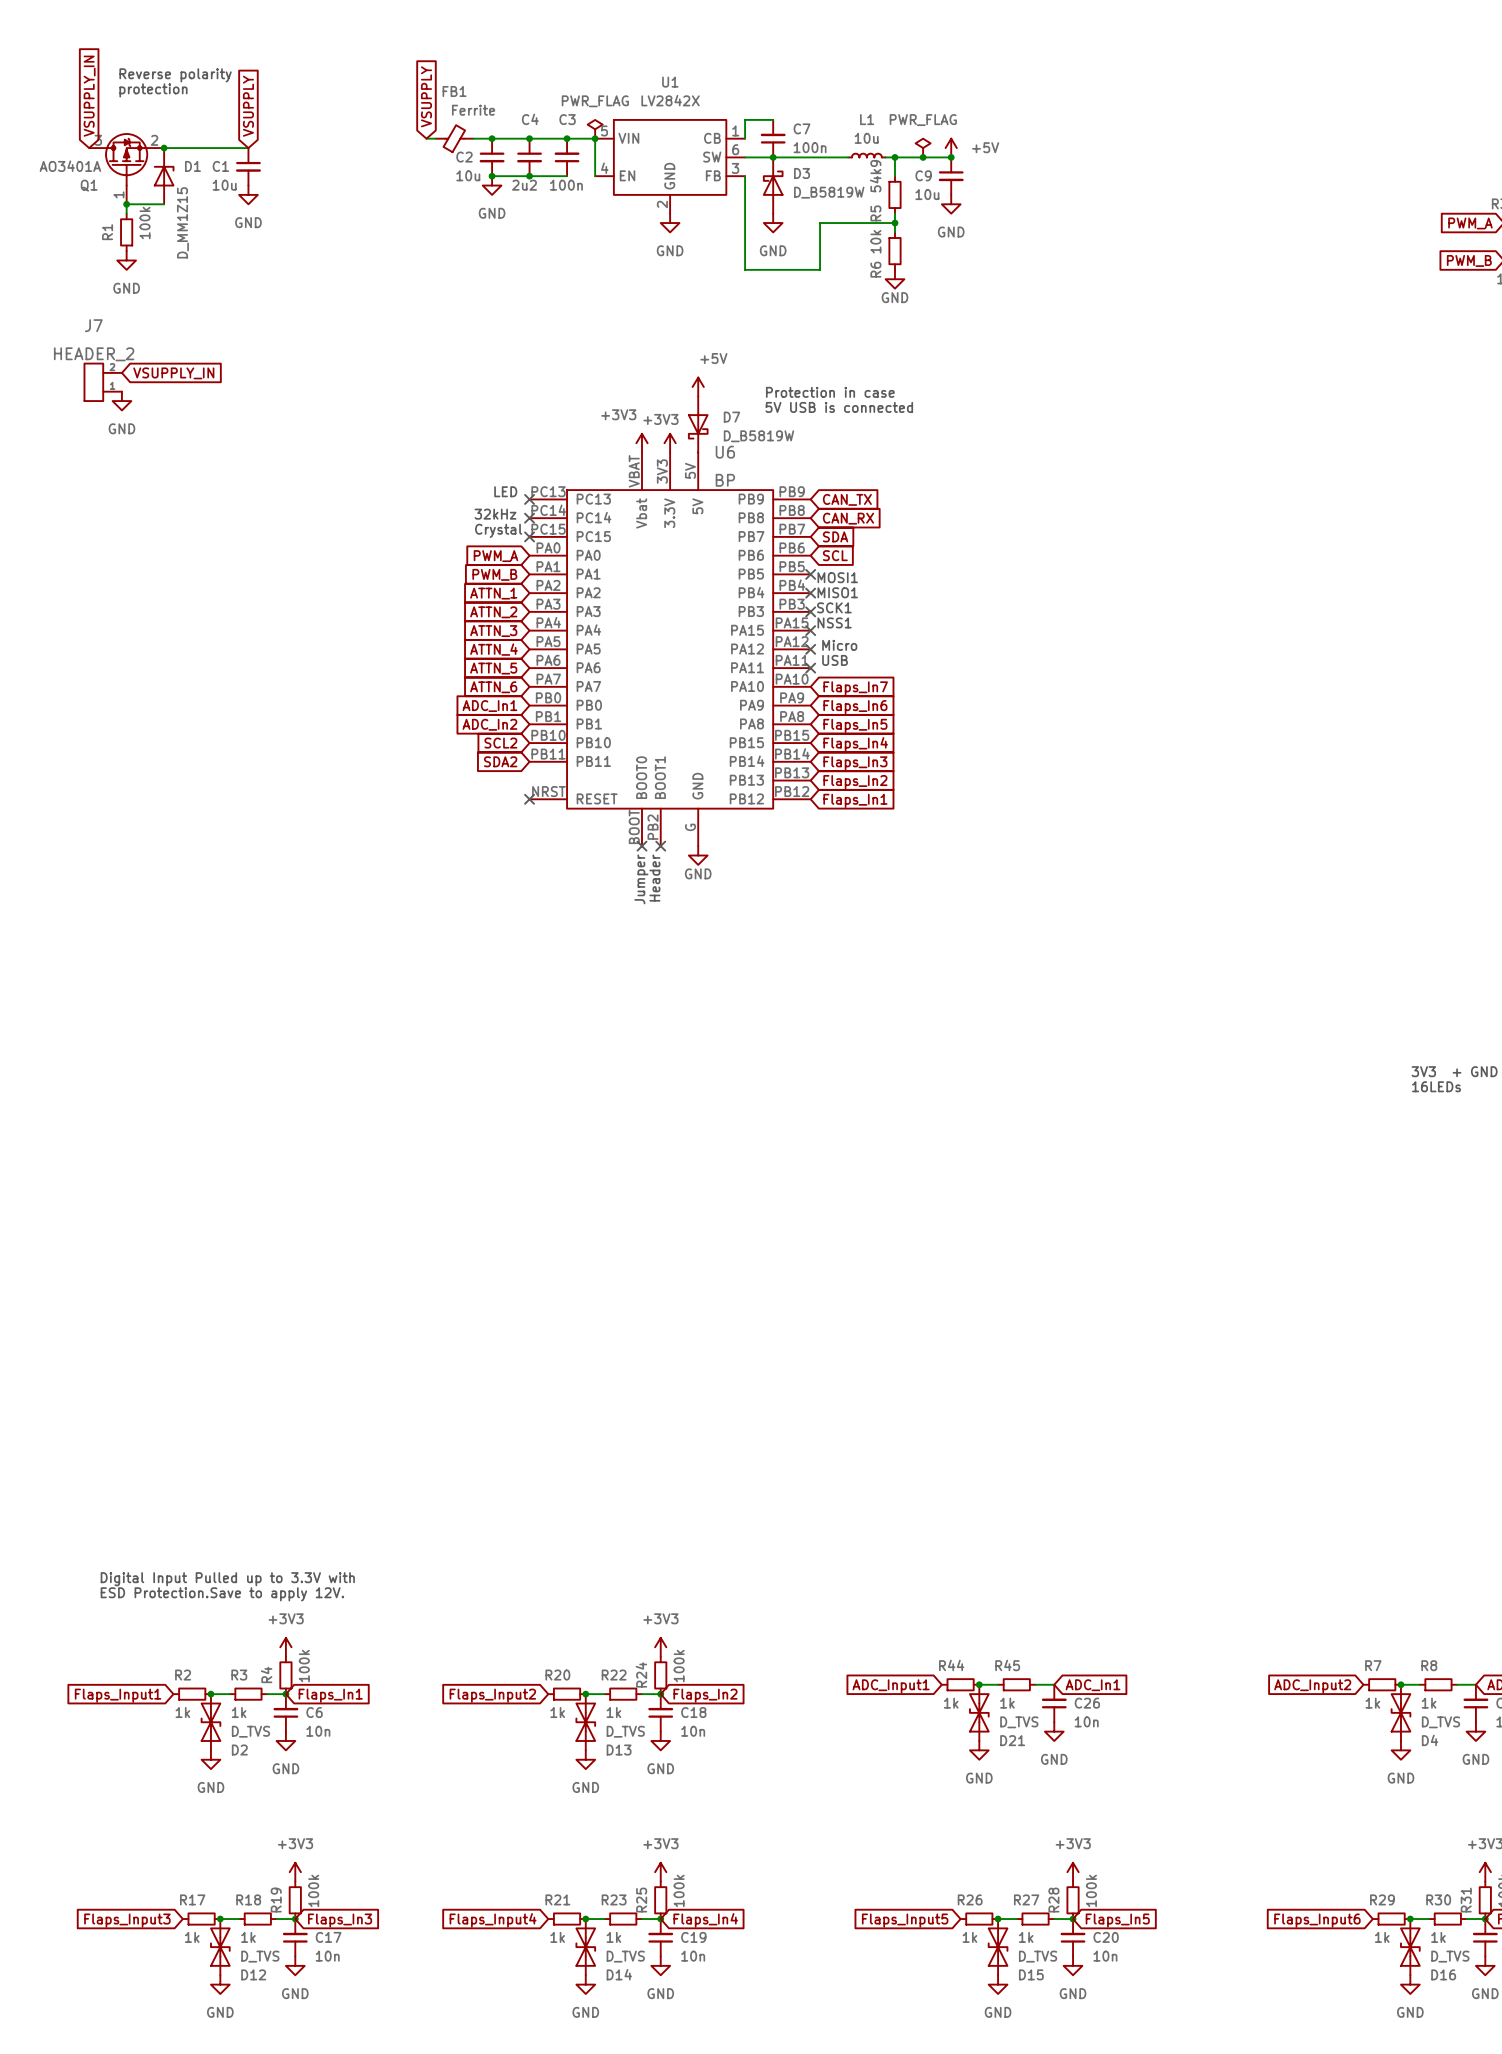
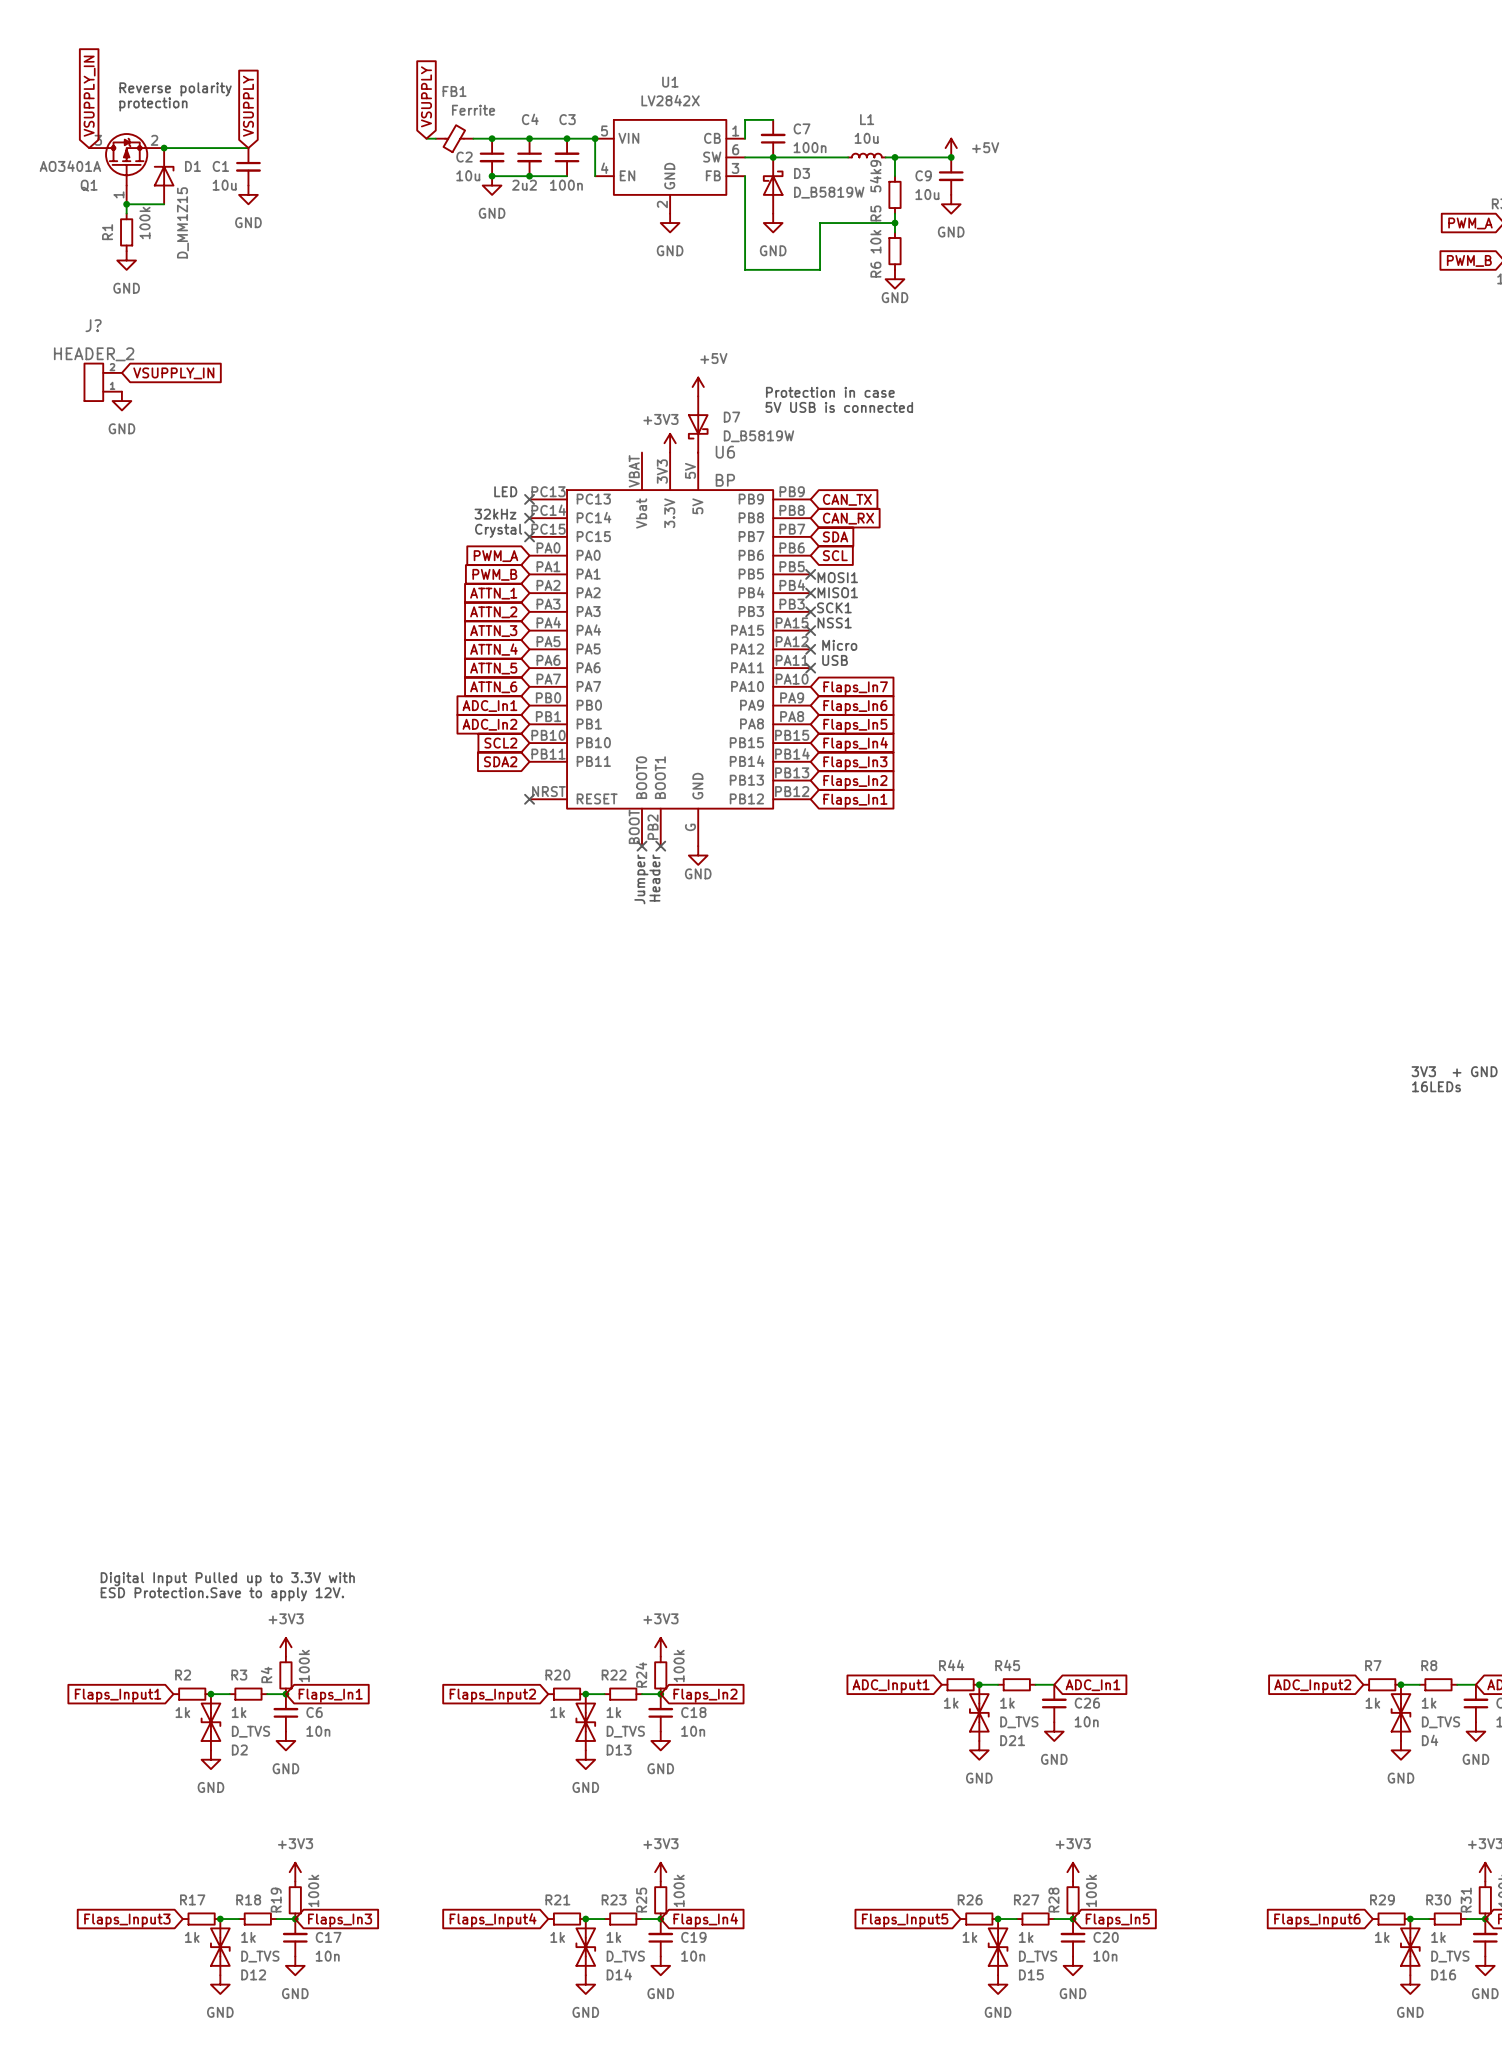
text: Reverse polarity (175, 75) -> none
text: protection (153, 90) -> Reverse polarity (175, 89)
text: none -> protection (153, 104)
power symbol: PWR_FLAG (595, 129) -> none
power symbol: PWR_FLAG (923, 148) -> none
junction: (923, 157) -> none
J7 name: J7 (93, 325) -> J? (93, 325)
power symbol: +3V3 (642, 443) -> none

